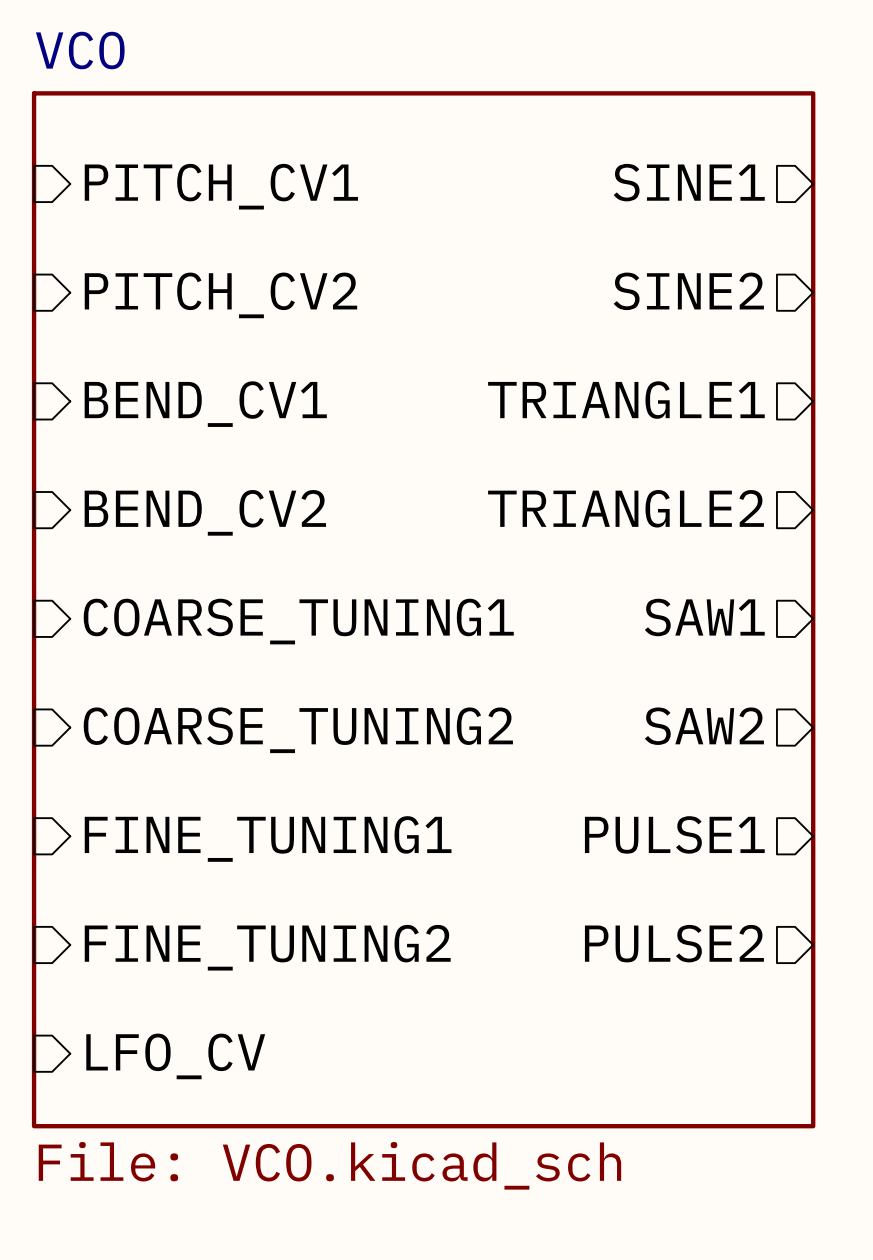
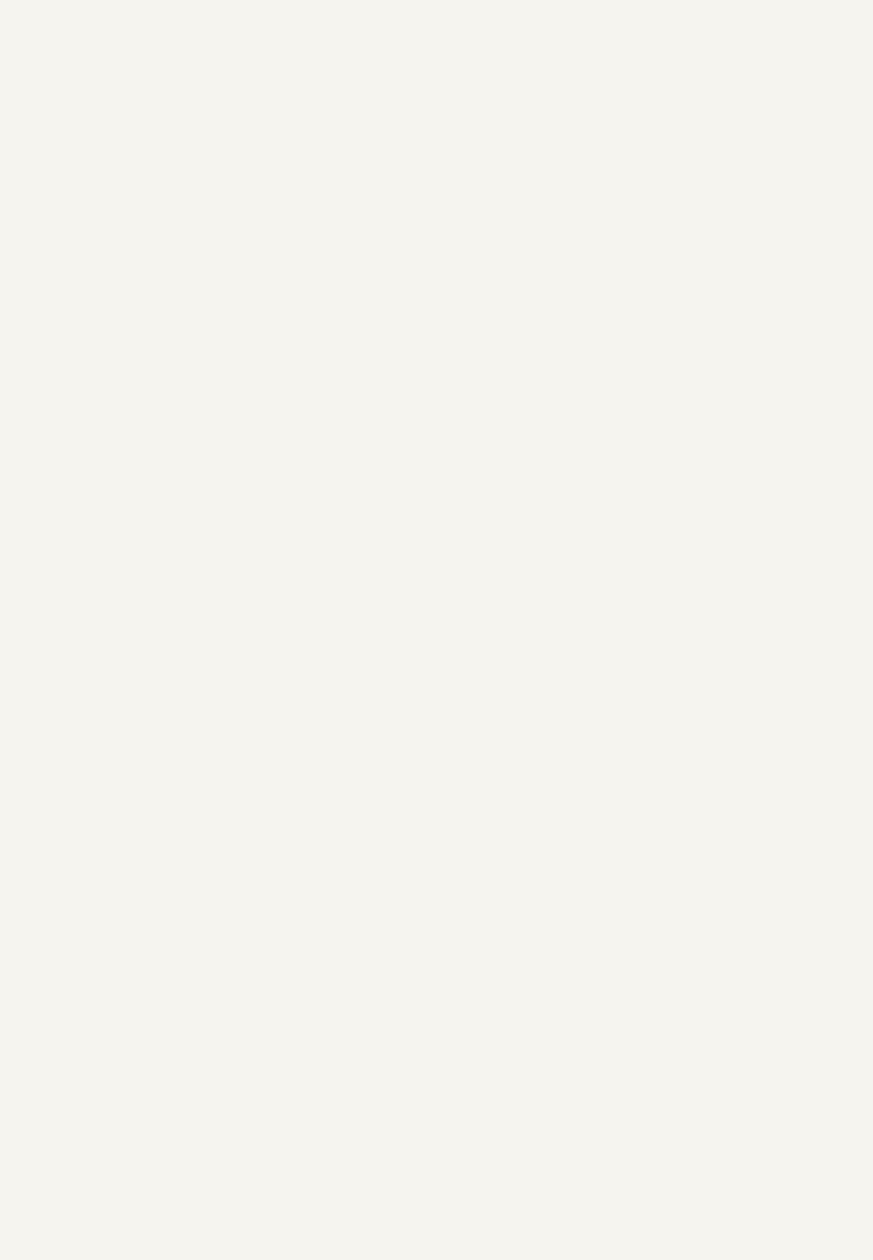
sheet pin: SINE1 (689, 182) -> none
sheet pin: PITCH_CV1 (221, 186) -> none
sheet pin: SINE2 (688, 291) -> none
sheet pin: PITCH_CV2 (220, 295) -> none
sheet pin: TRIANGLE1 (626, 400) -> none
sheet pin: BEND_CV1 (205, 404) -> none
sheet pin: TRIANGLE2 (626, 508) -> none
sheet pin: BEND_CV2 (205, 512) -> none
sheet VCO: File: VCO.kicad_sch (423, 609) -> none
sheet pin: SAW1 (704, 617) -> none
sheet pin: COARSE_TUNING1 (298, 621) -> none
sheet pin: SAW2 (704, 726) -> none
sheet pin: COARSE_TUNING2 (298, 730) -> none
sheet pin: PULSE1 (674, 834) -> none
sheet pin: FINE_TUNING1 (268, 838) -> none
sheet pin: PULSE2 (674, 943) -> none
sheet pin: FINE_TUNING2 (267, 947) -> none
sheet pin: LFO_CV (175, 1056) -> none

